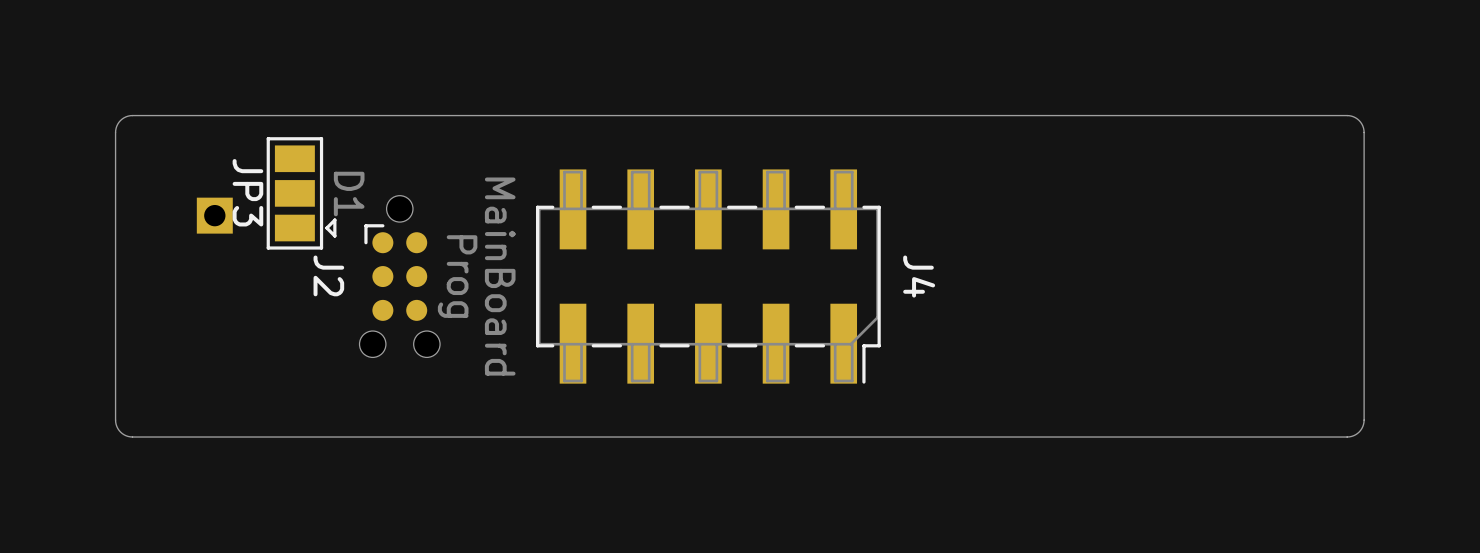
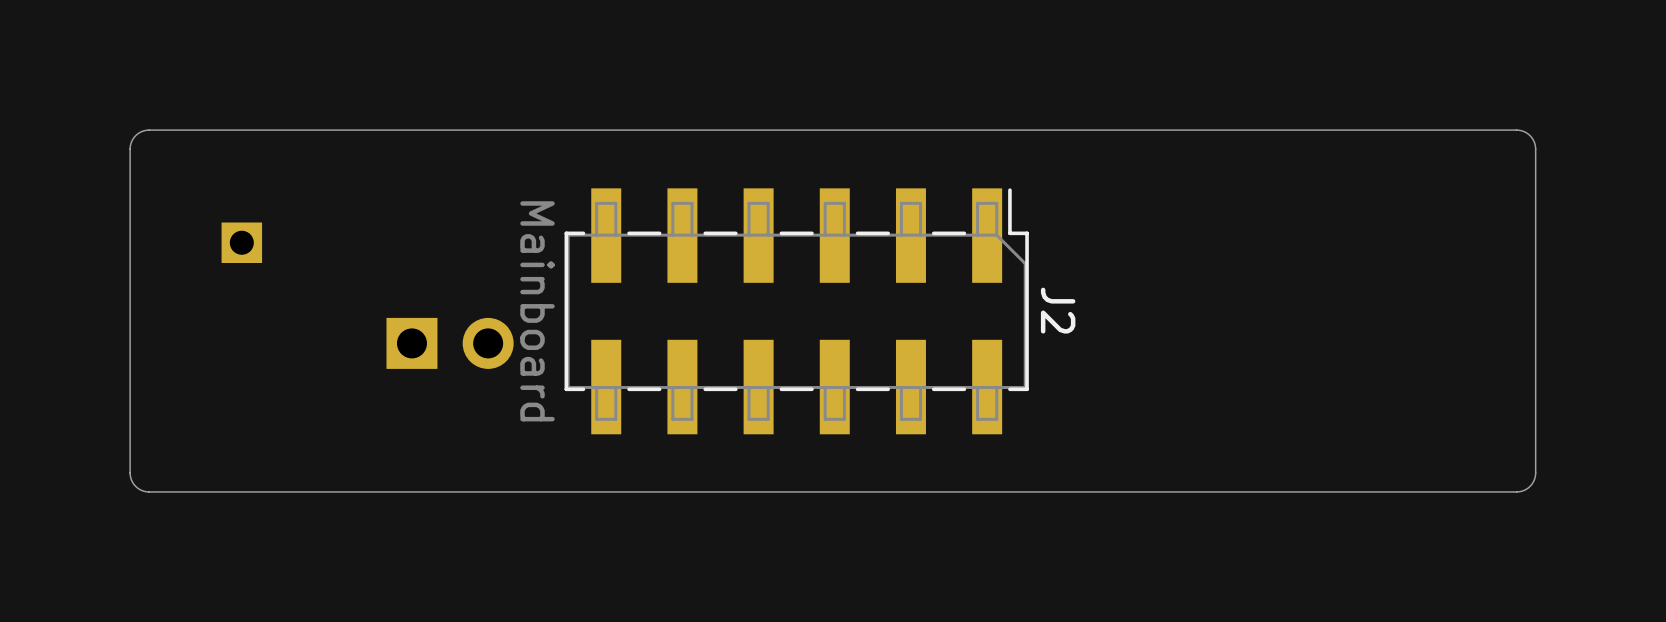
JP3: D1 (301, 193) -> none
J2 footprint: [359, 195, 441, 358] -> [564, 188, 1029, 435]
J2 name position: J2 (328, 275) -> J2 (1058, 310)
J2 value: Prog (457, 276) -> Mainboard (537, 311)
J4: MainBoard (708, 276) -> none
part: none -> (450, 343)

